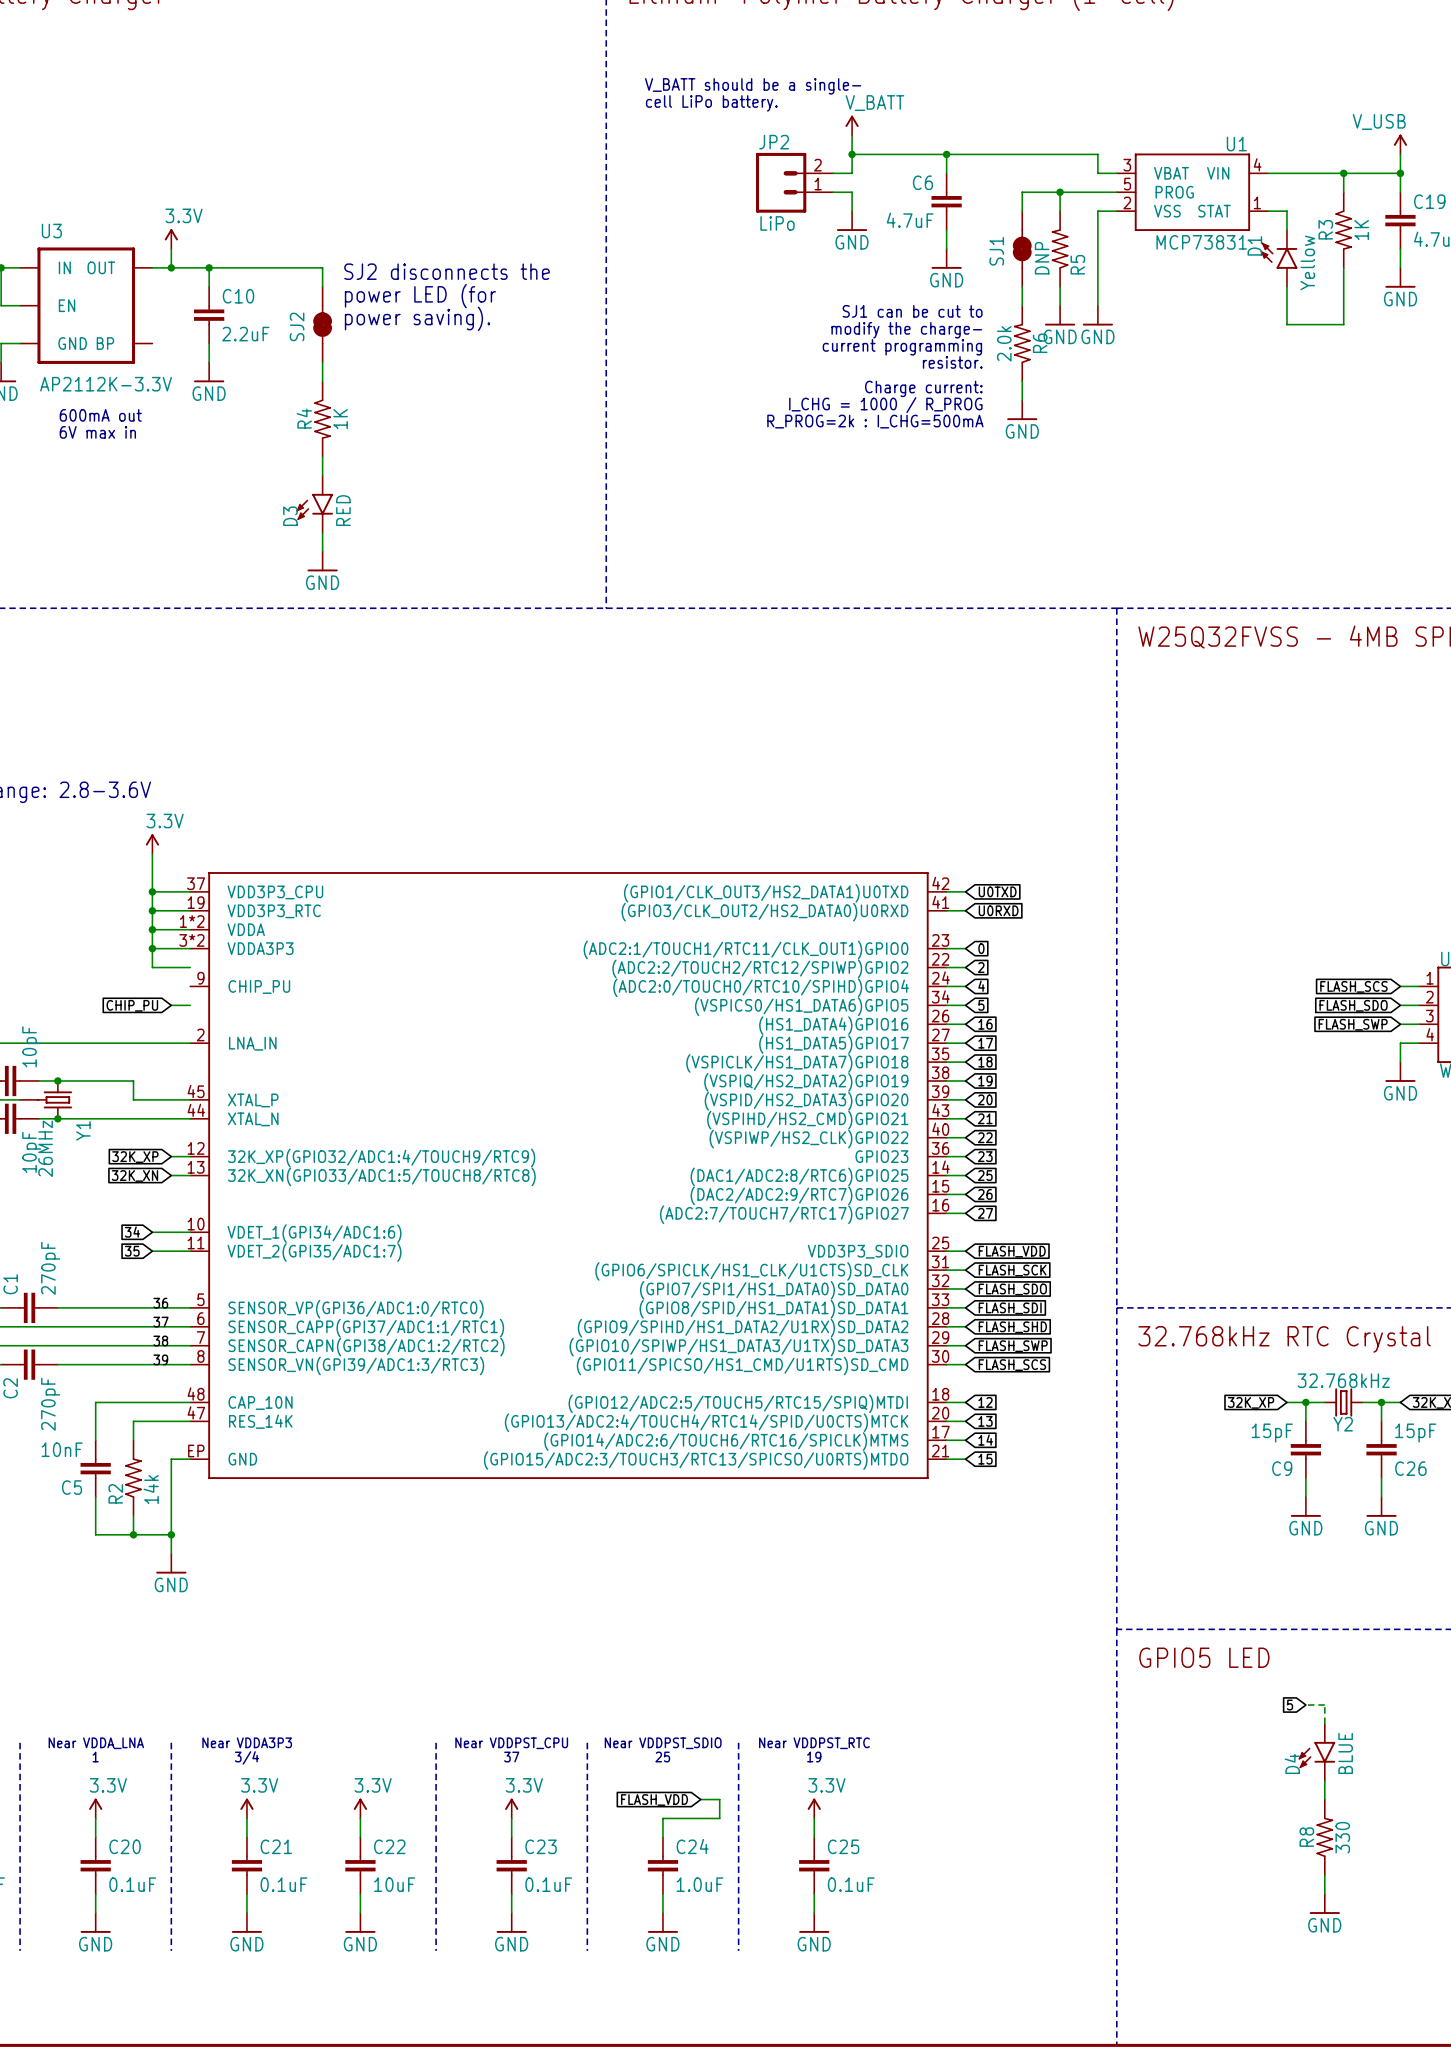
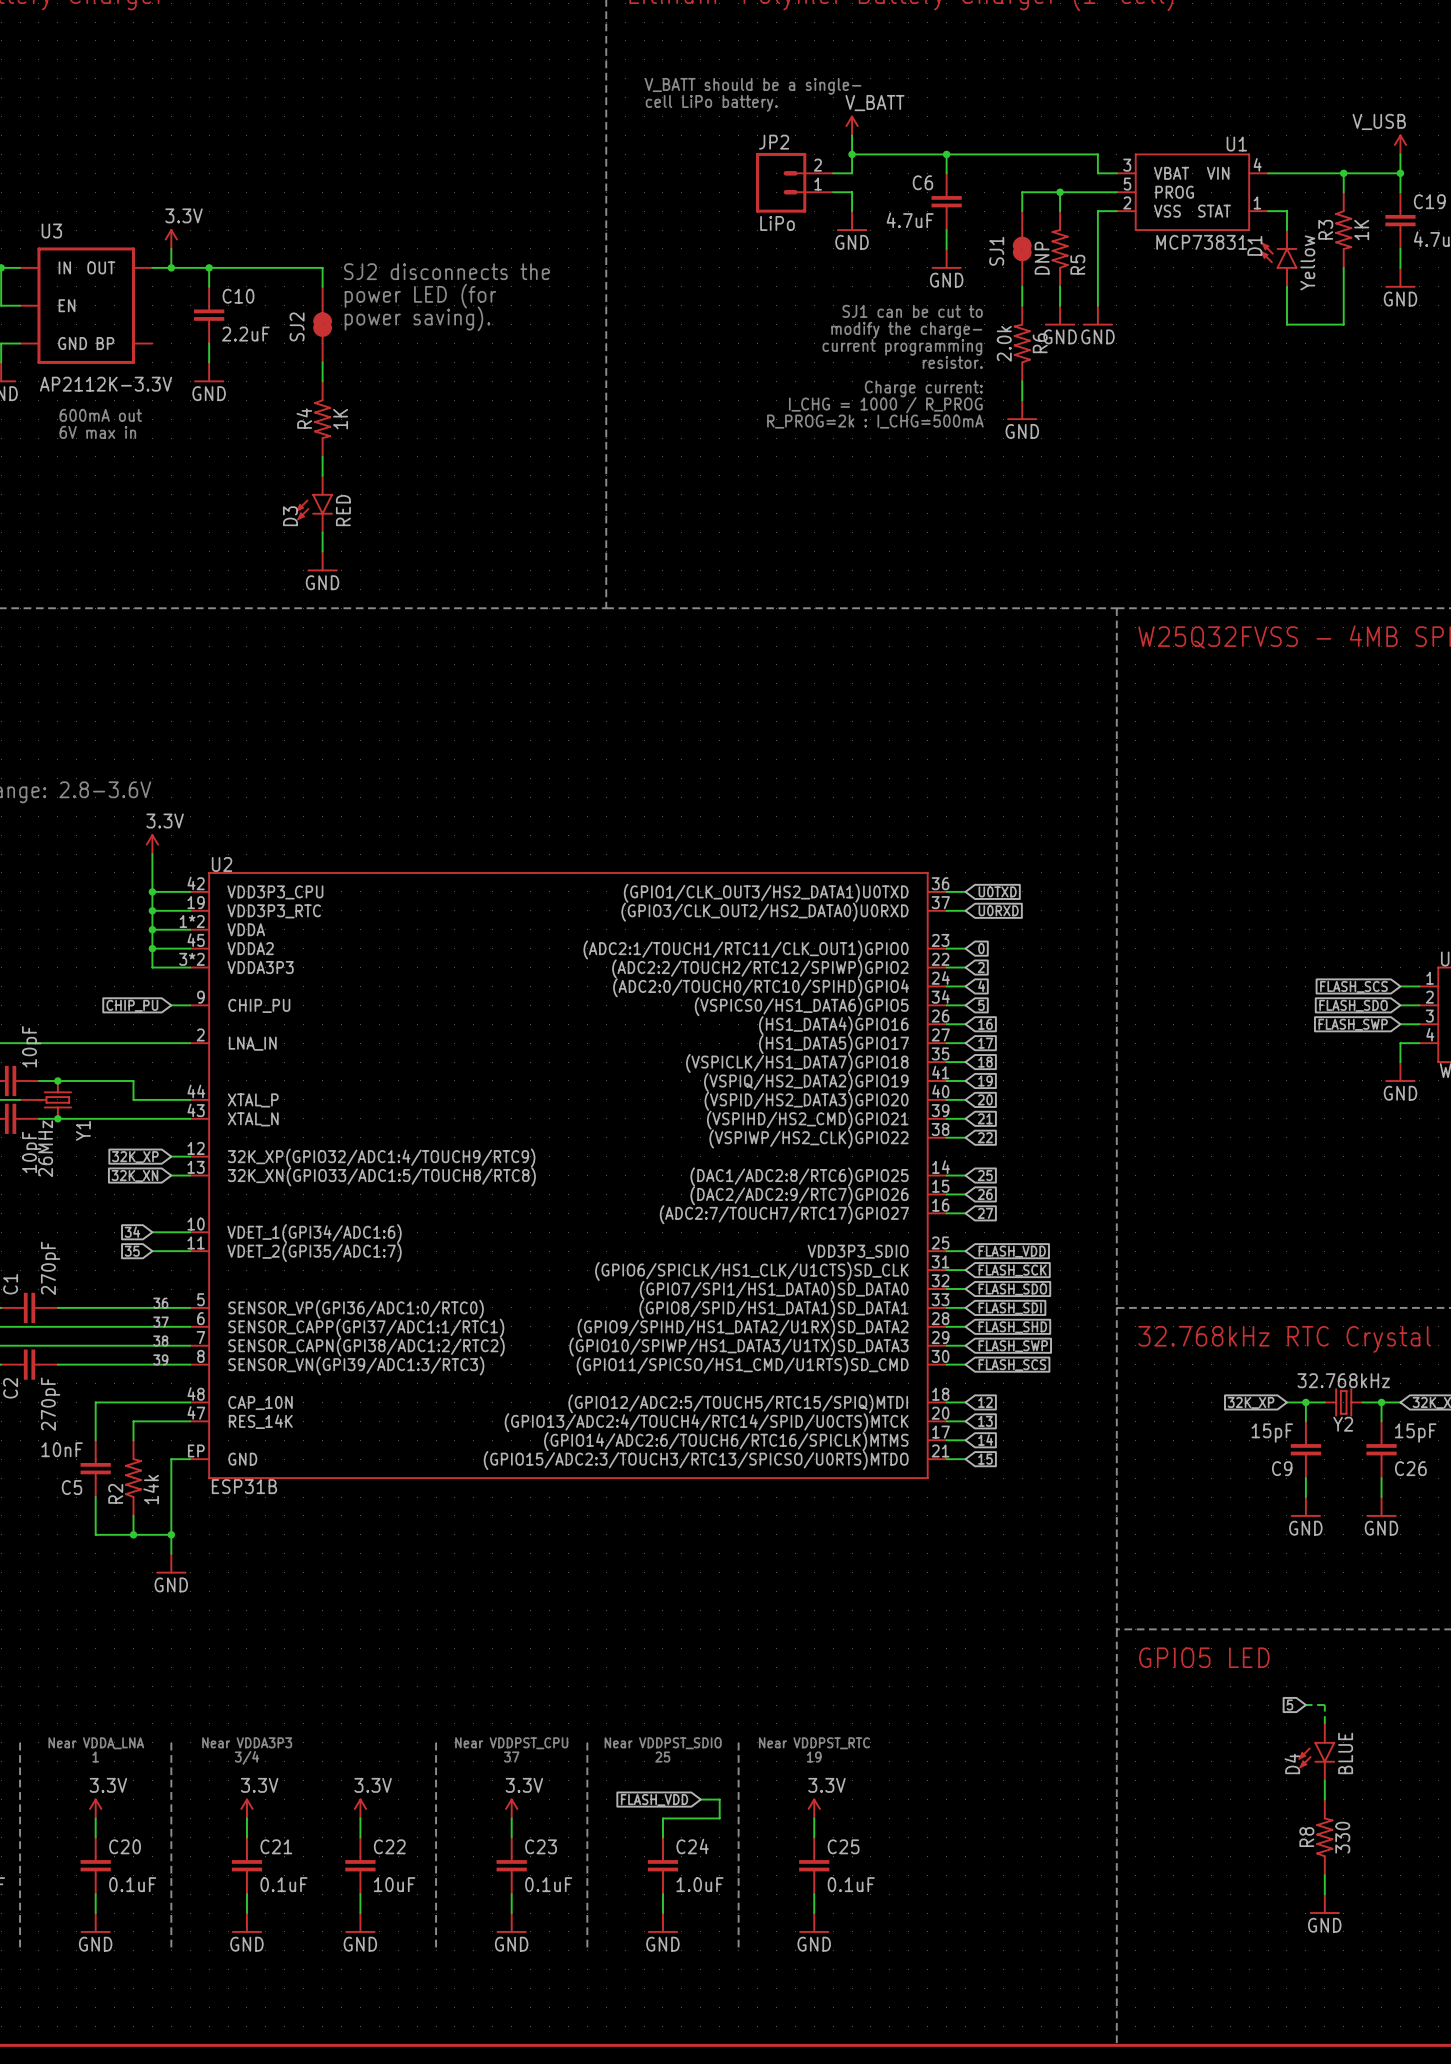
wire: (946, 1156) (965, 1156) -> none
global label: 23 (985, 1156) -> none
part: (568, 1175) -> none
U2: none -> ESP31B (568, 1175)

